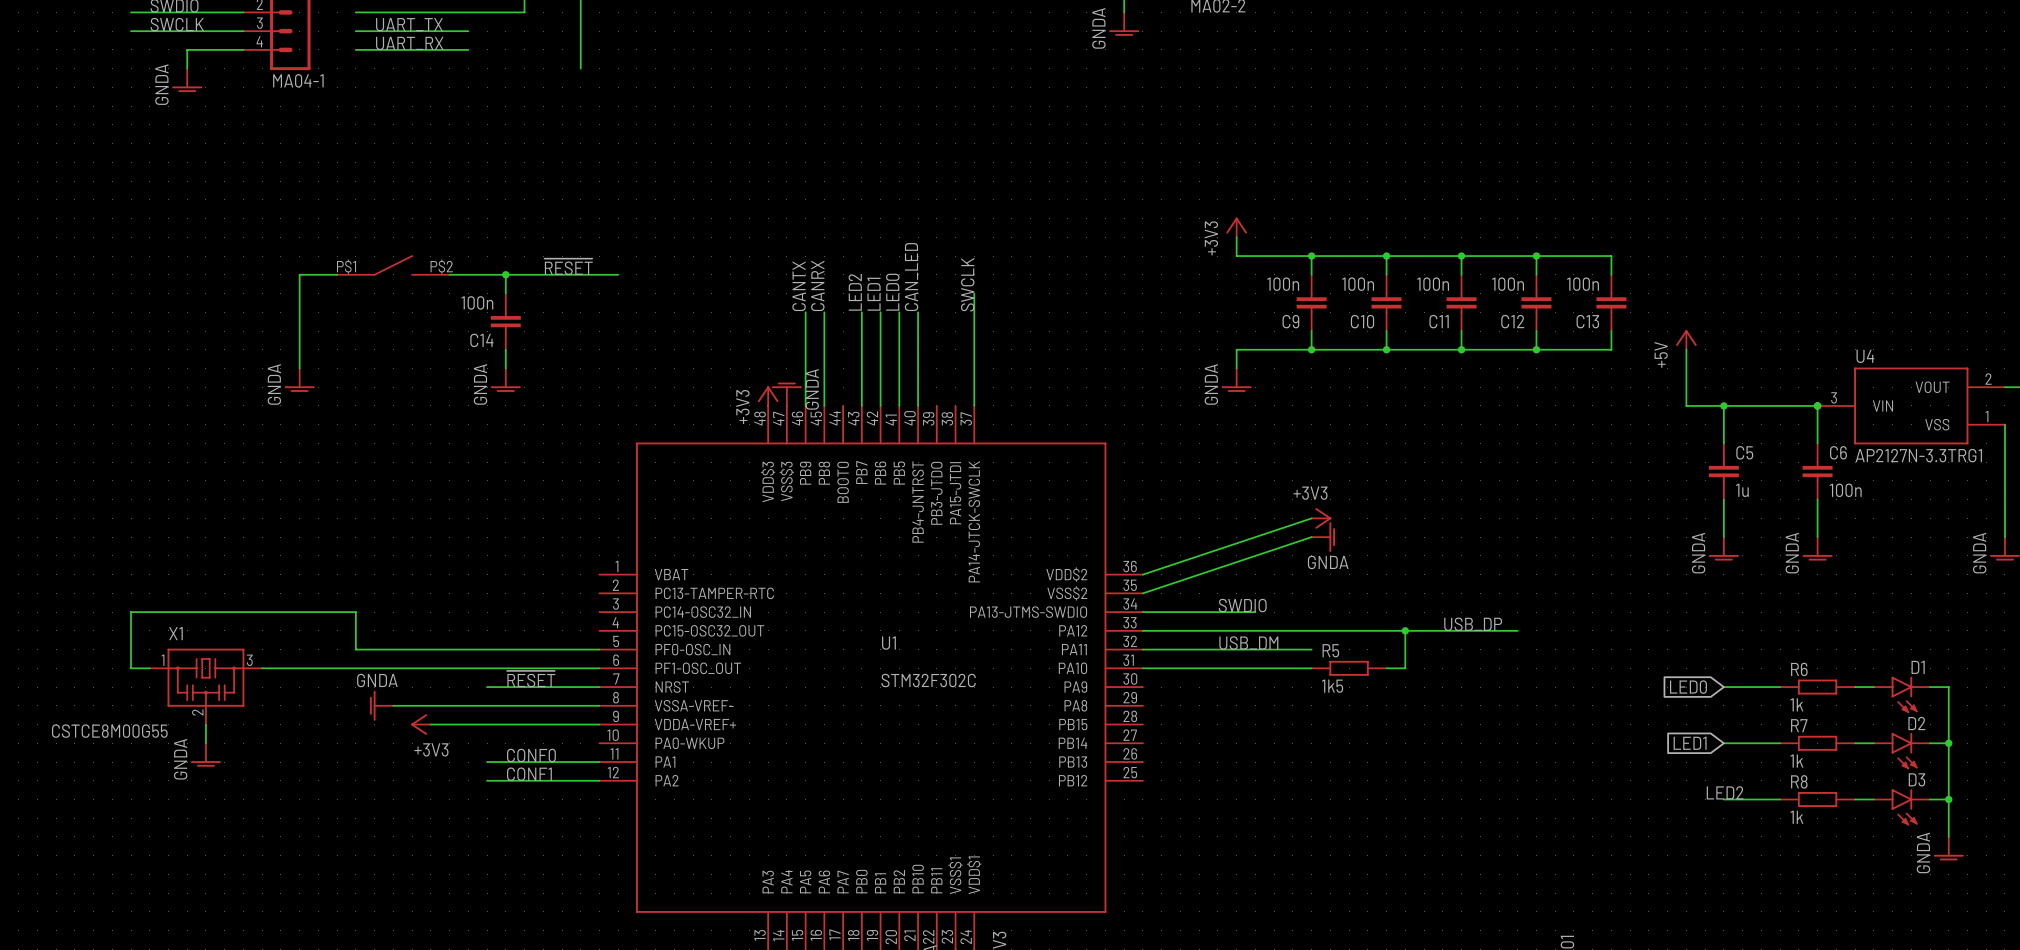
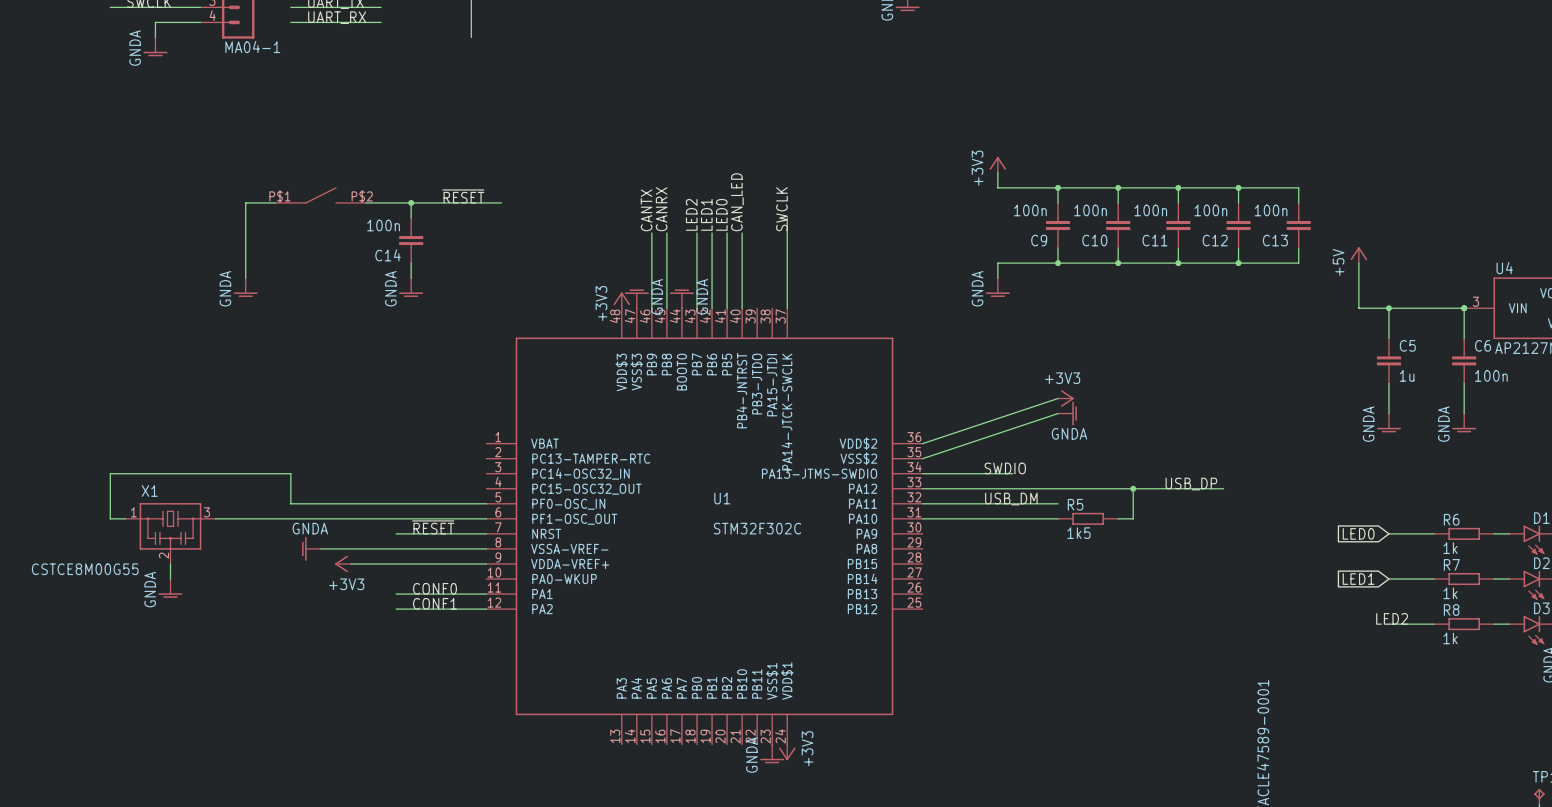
power symbol: none -> GNDA (681, 298)

